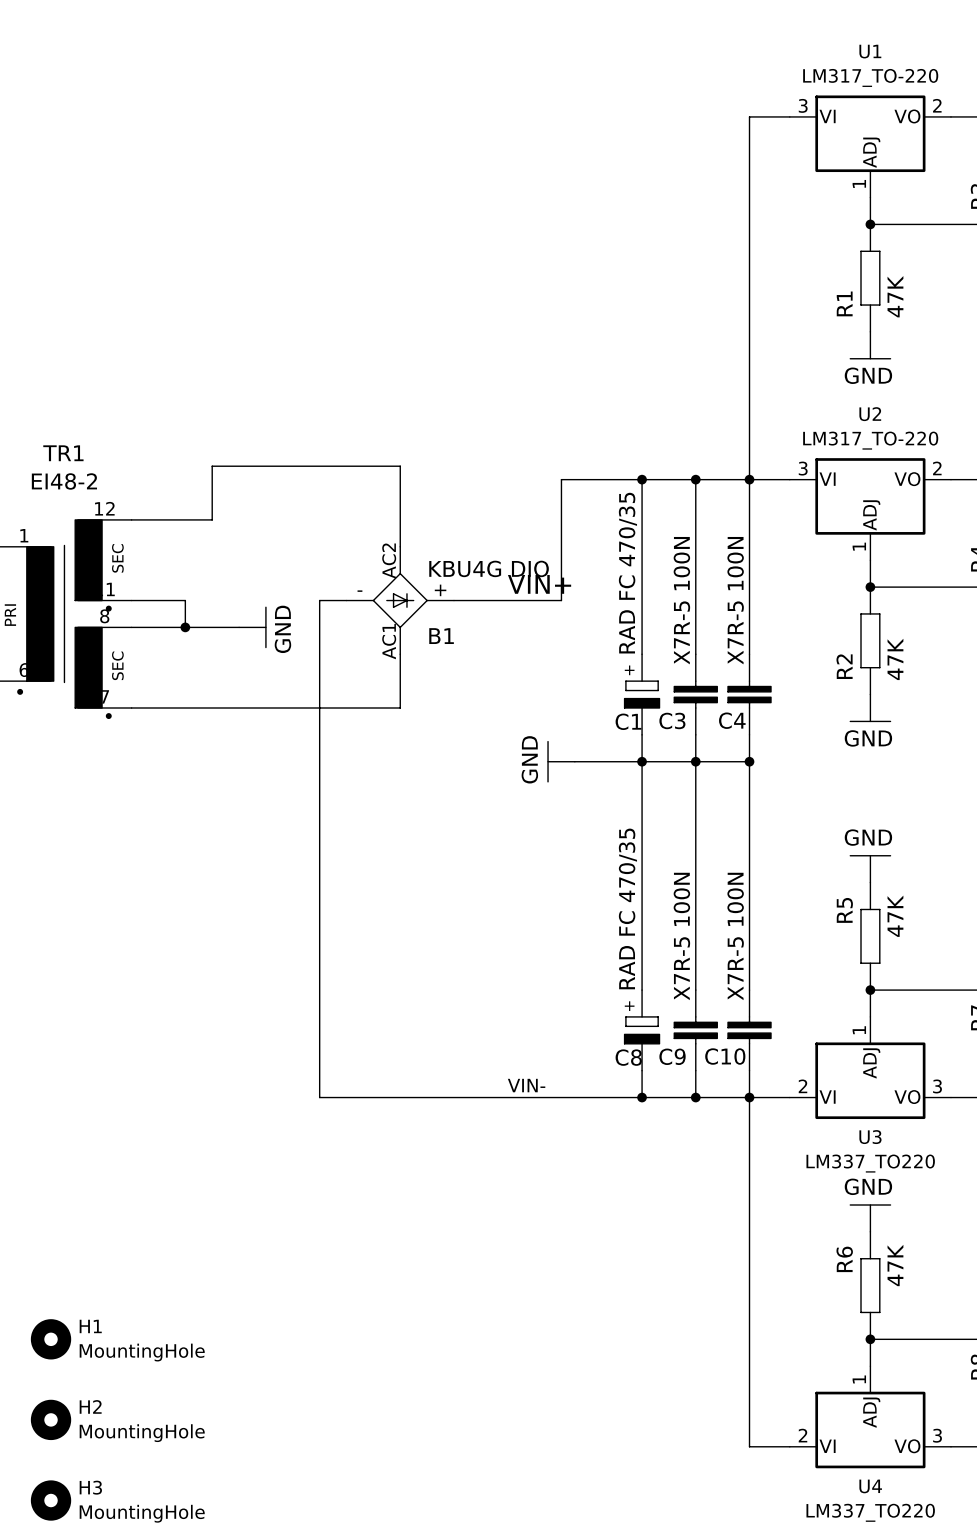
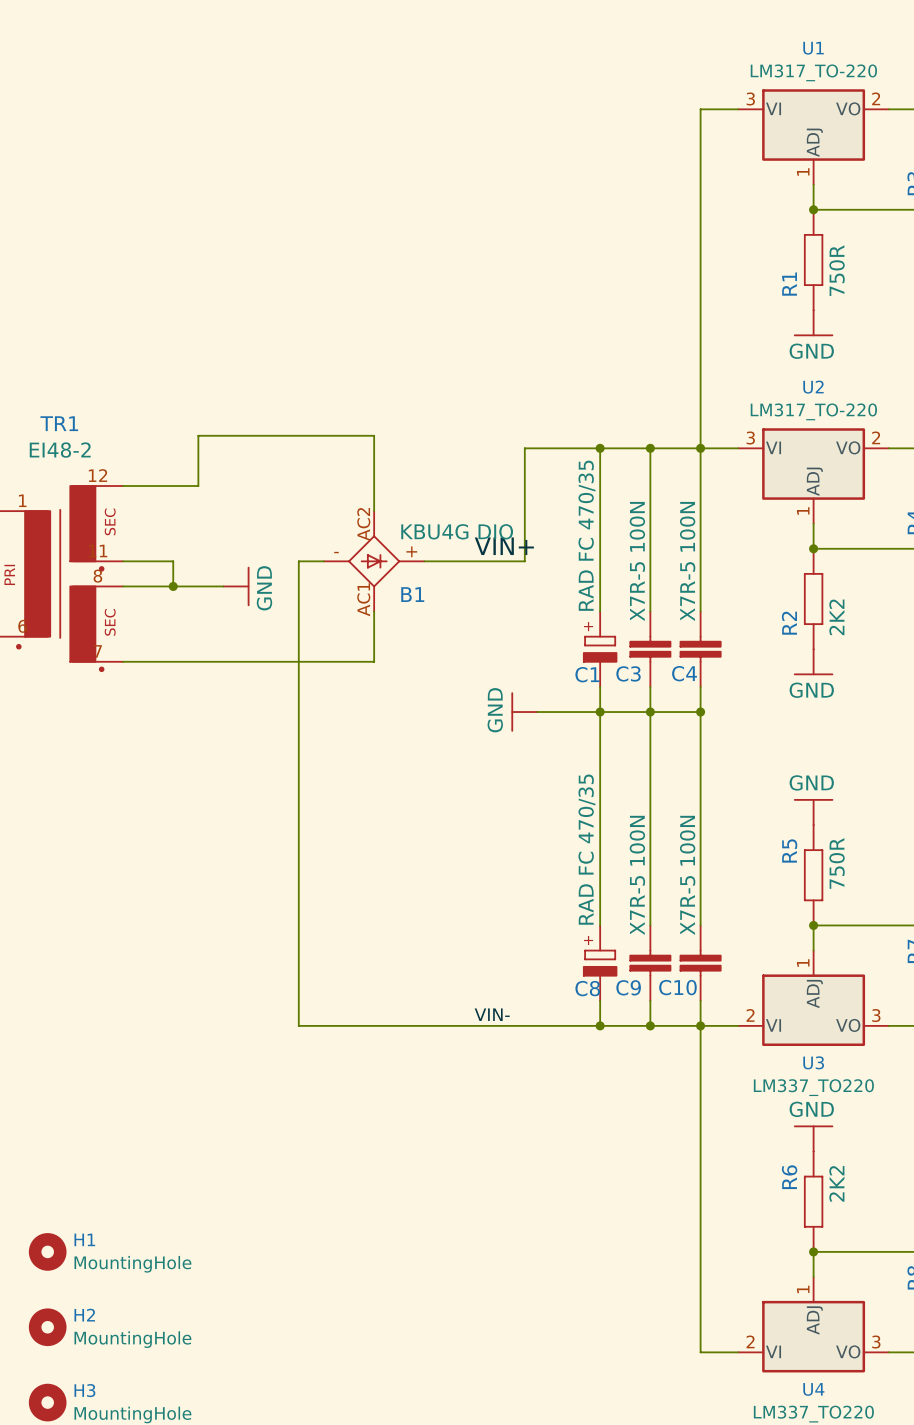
R1 value: 47K (895, 296) -> 750R (837, 270)
R2 value: 47K (895, 659) -> 2K2 (836, 617)
R5 value: 47K (895, 916) -> 750R (837, 863)
R6 value: 47K (895, 1265) -> 2K2 (836, 1183)

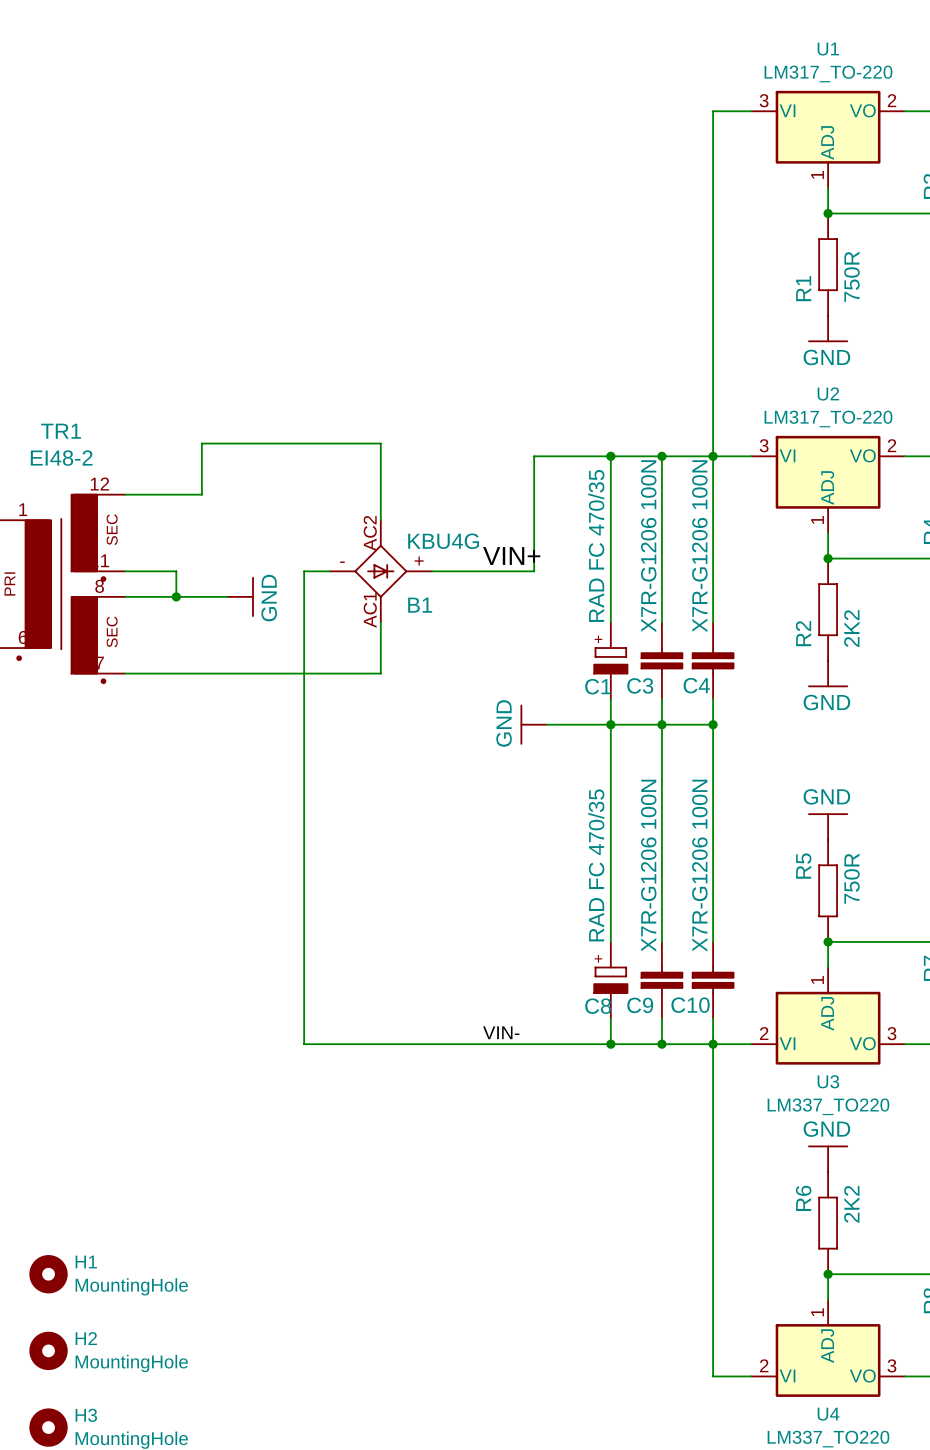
B1 value: KBU4G DIO (457, 531) -> KBU4G (443, 541)
C3 value: X7R-5 100N (637, 561) -> X7R-G1206 100N (648, 546)
C4 value: X7R-5 100N (687, 561) -> X7R-G1206 100N (699, 546)
C9 value: X7R-5 100N (637, 875) -> X7R-G1206 100N (648, 865)
C10 value: X7R-5 100N (687, 875) -> X7R-G1206 100N (699, 865)

